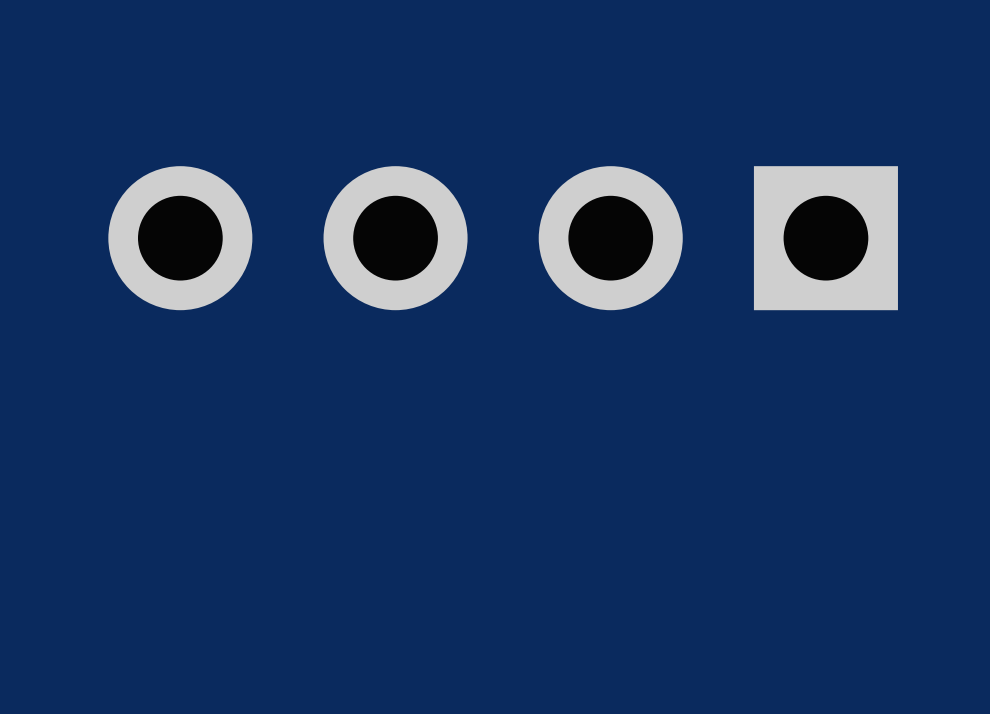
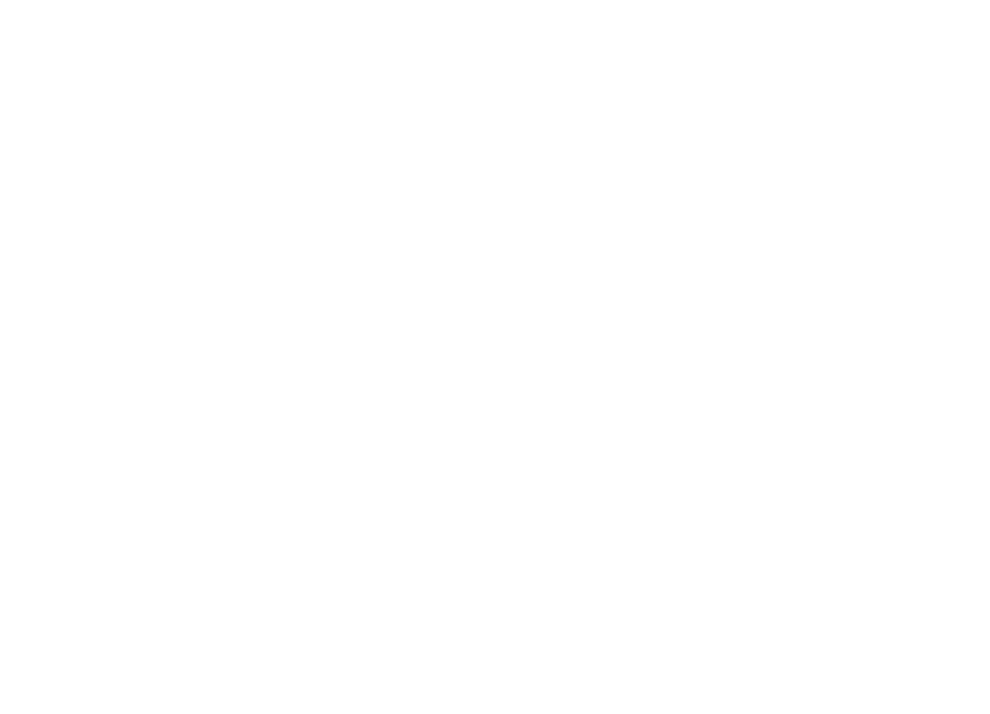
part: (503, 238) -> none

